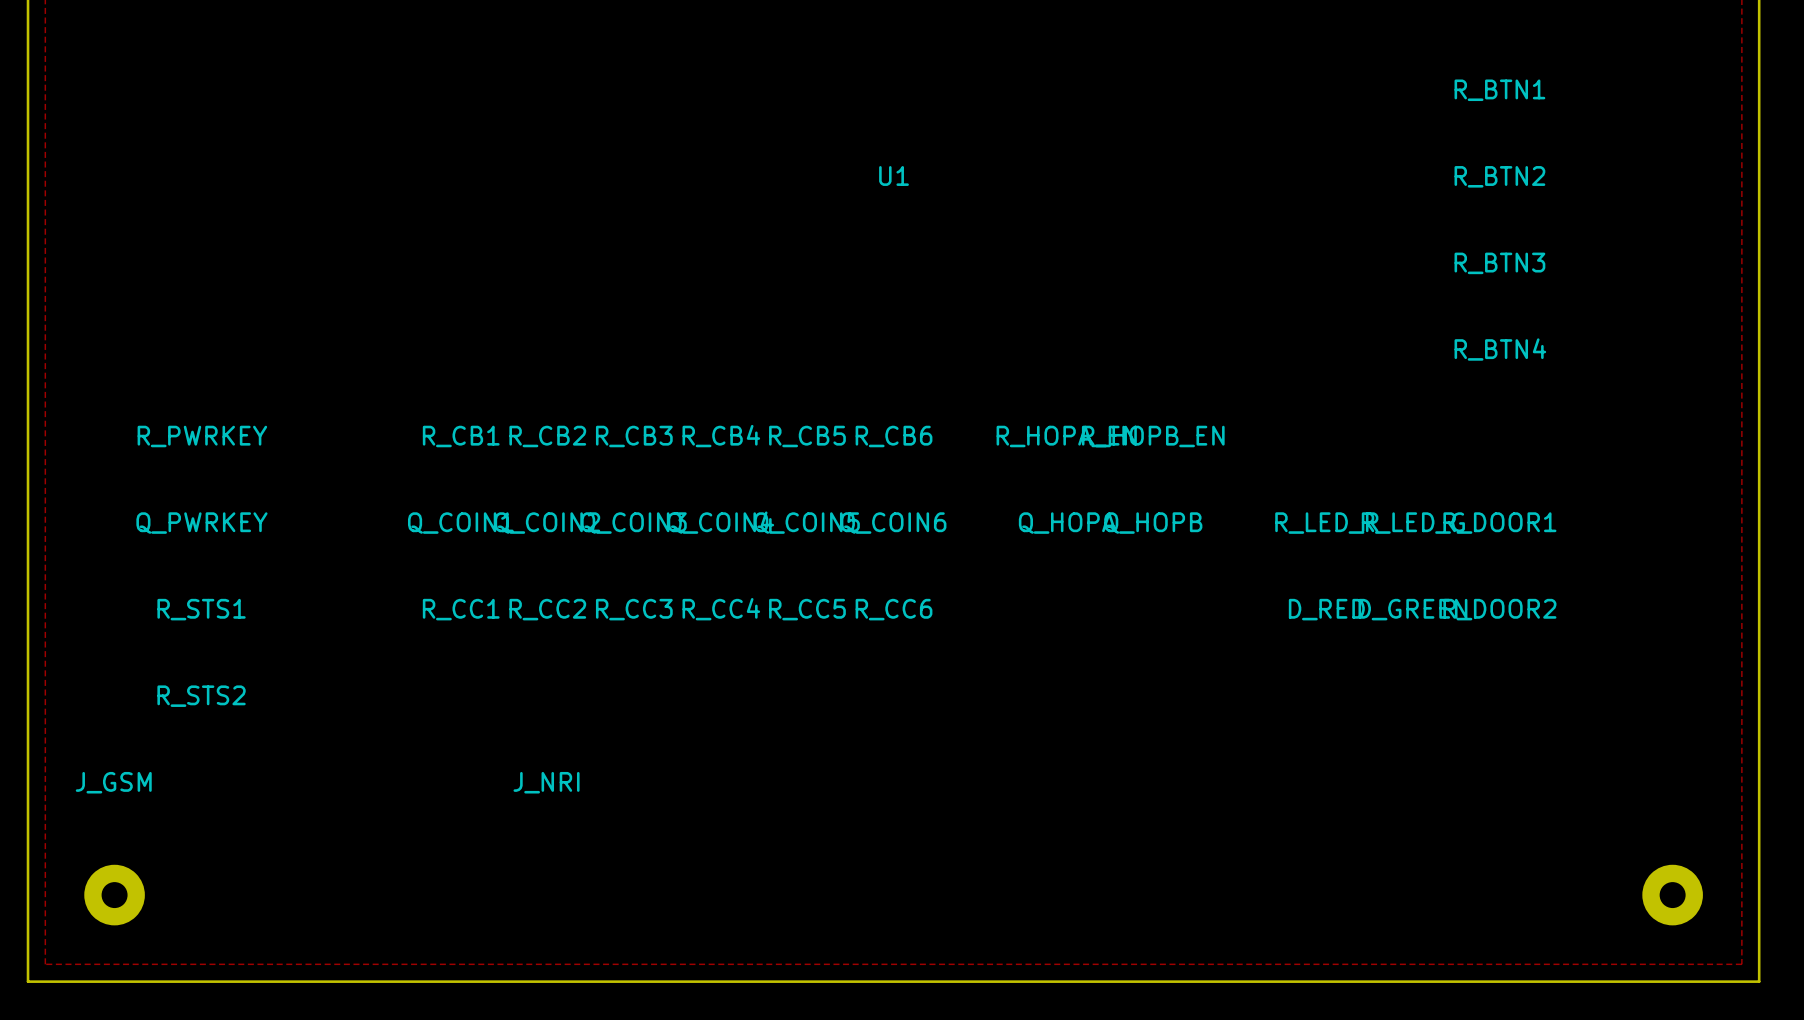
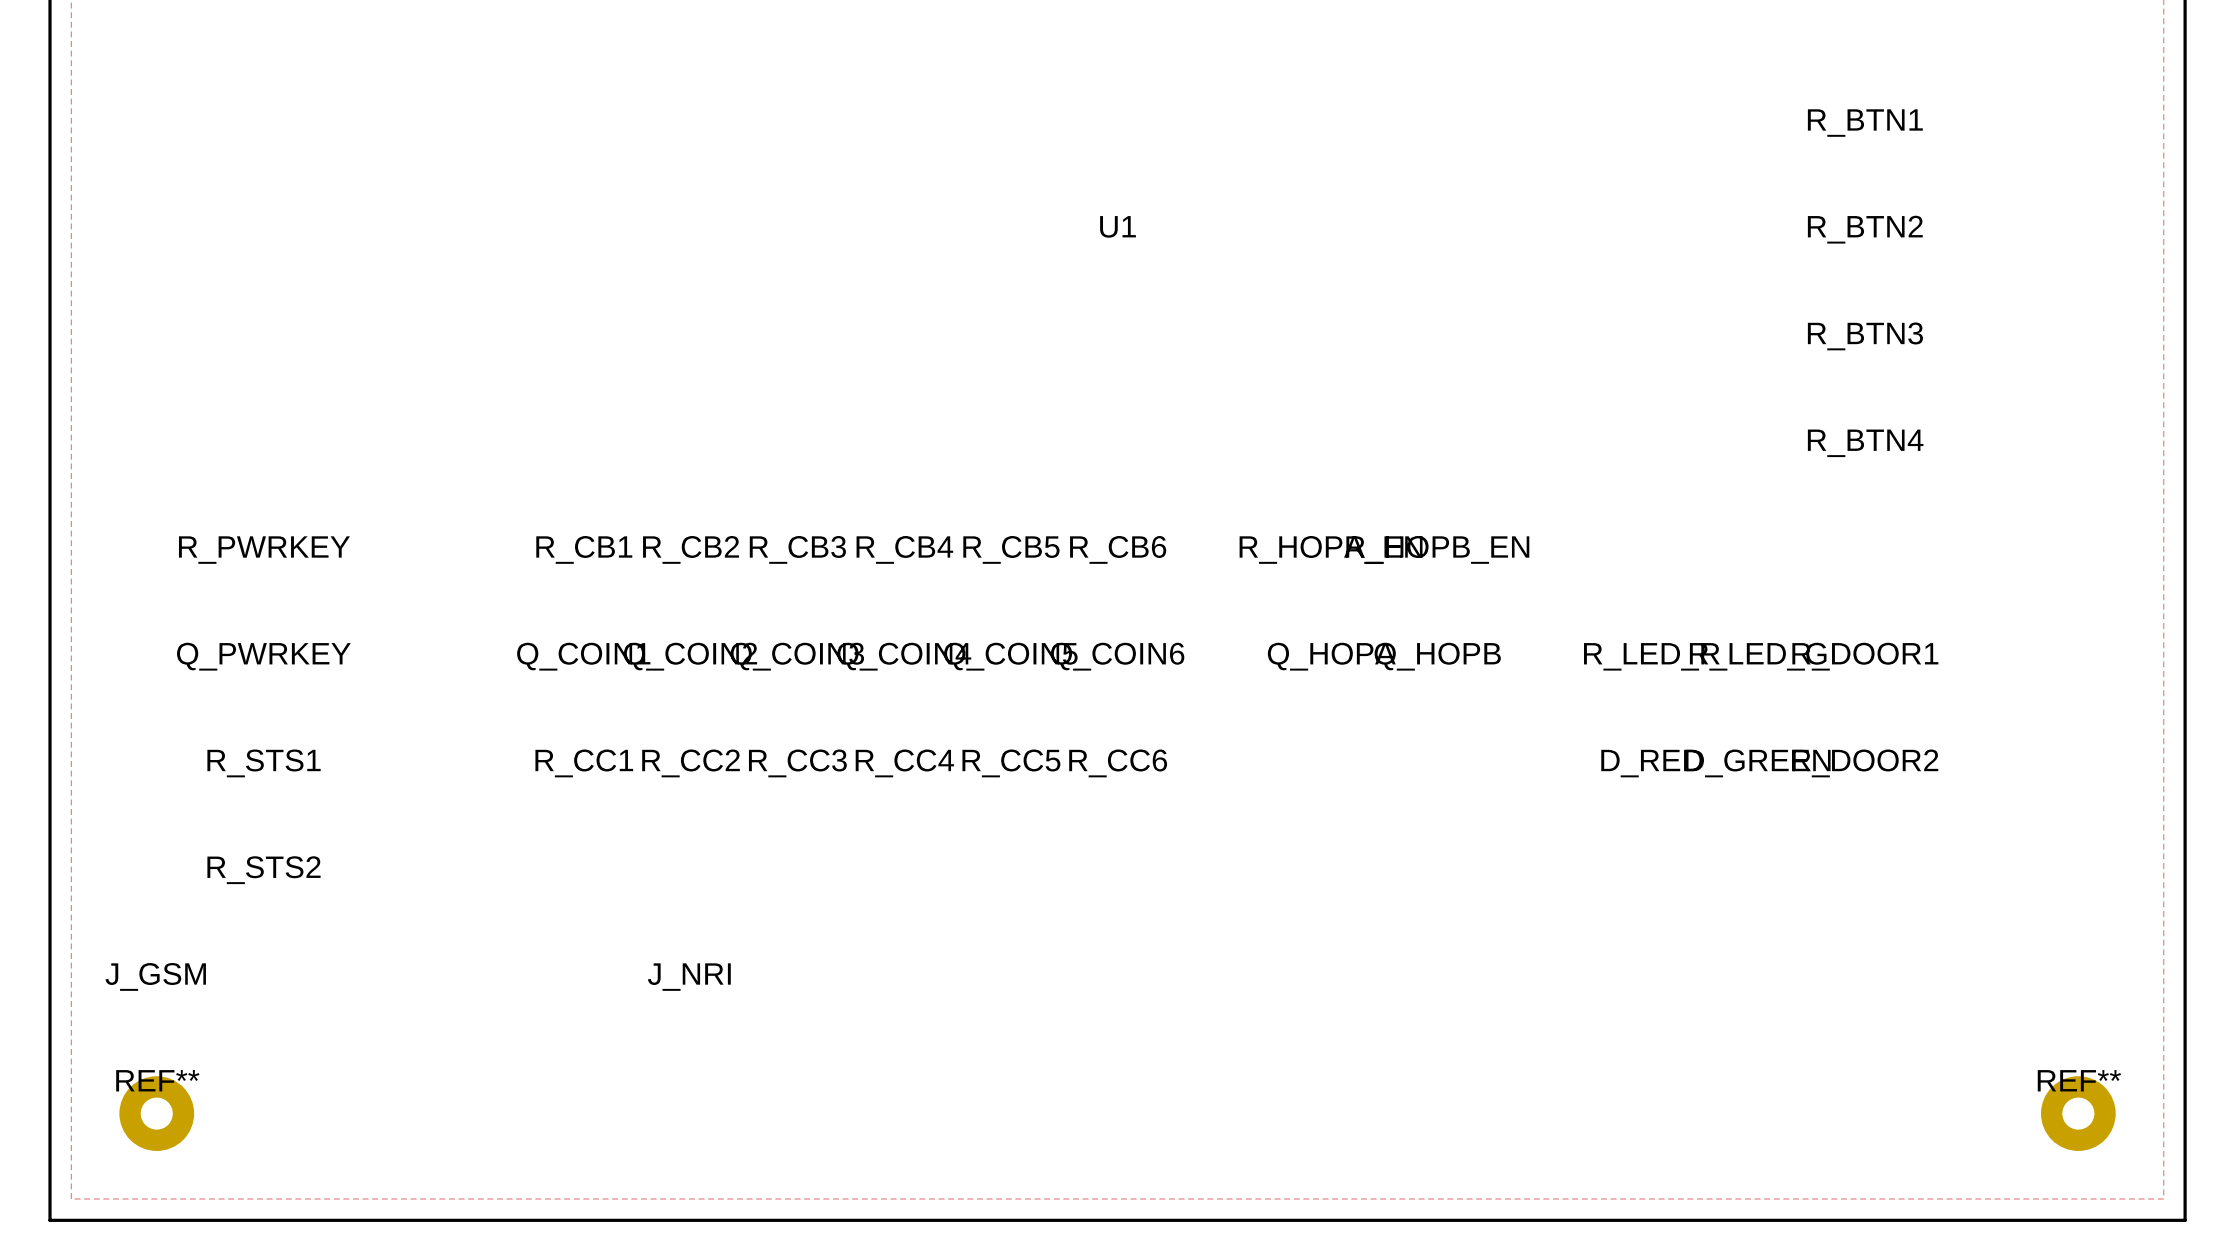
REF** name: none -> REF** (157, 1080)
REF** name: none -> REF** (2079, 1080)

